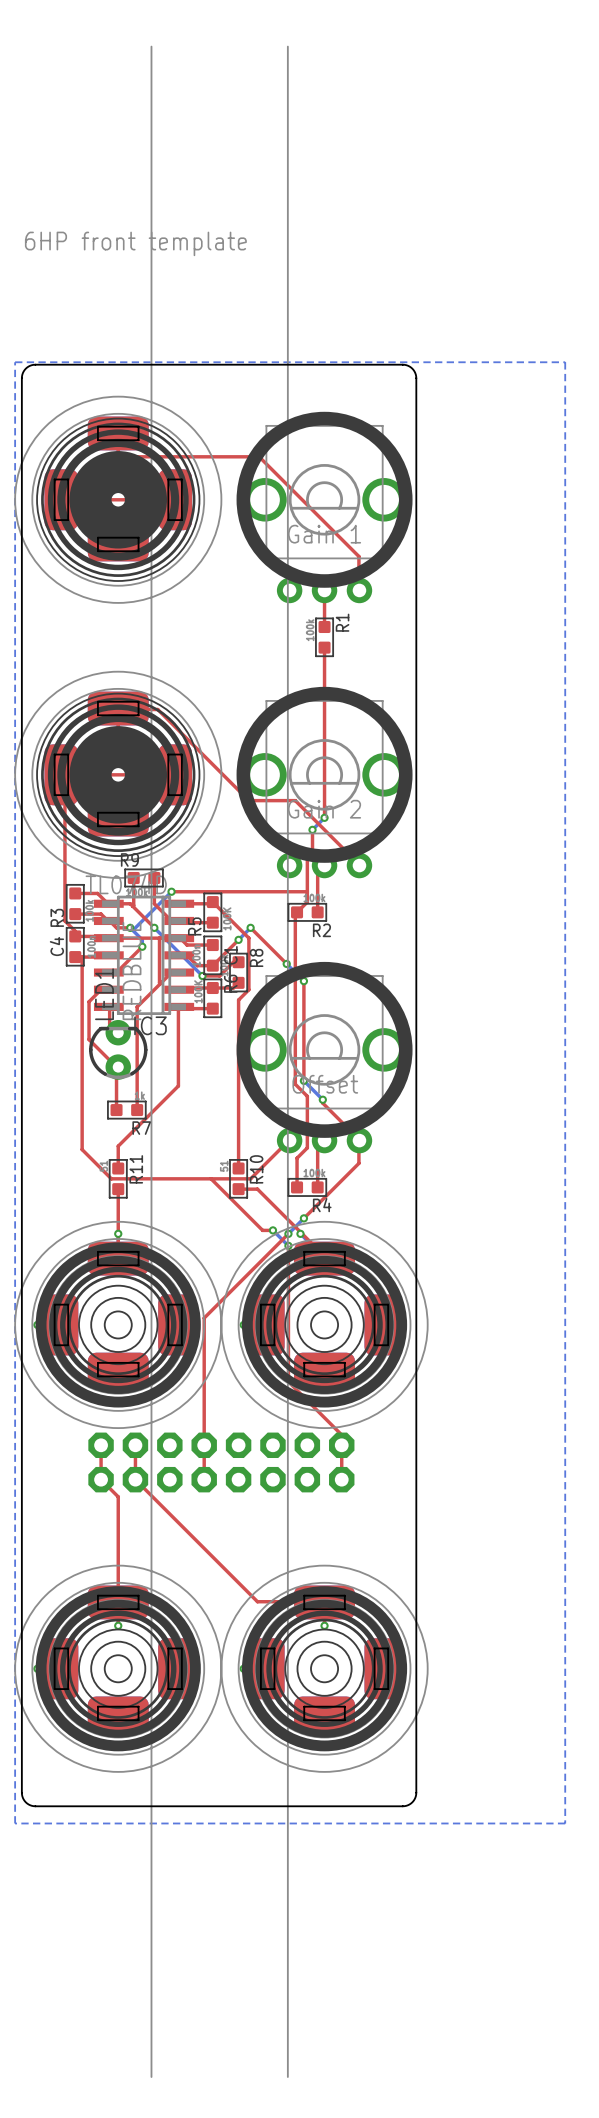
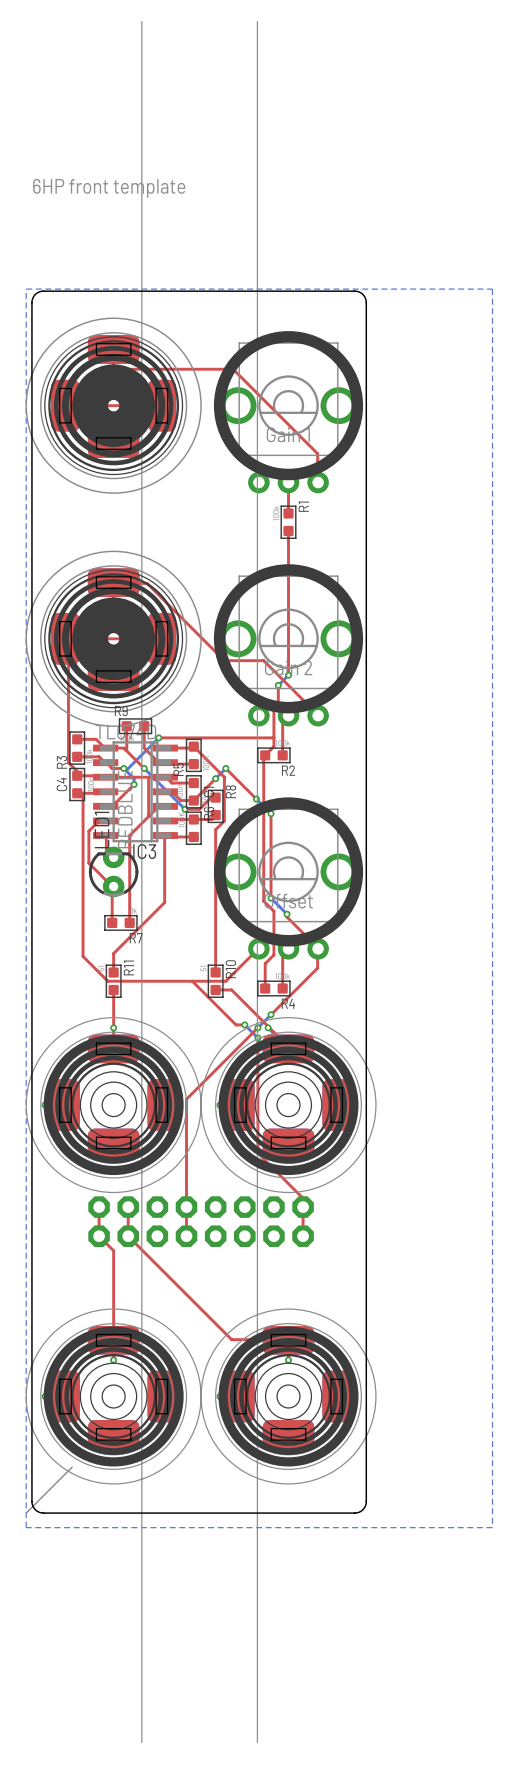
drawing shape: [21, 46, 418, 2078] -> [25, 21, 368, 1743]

